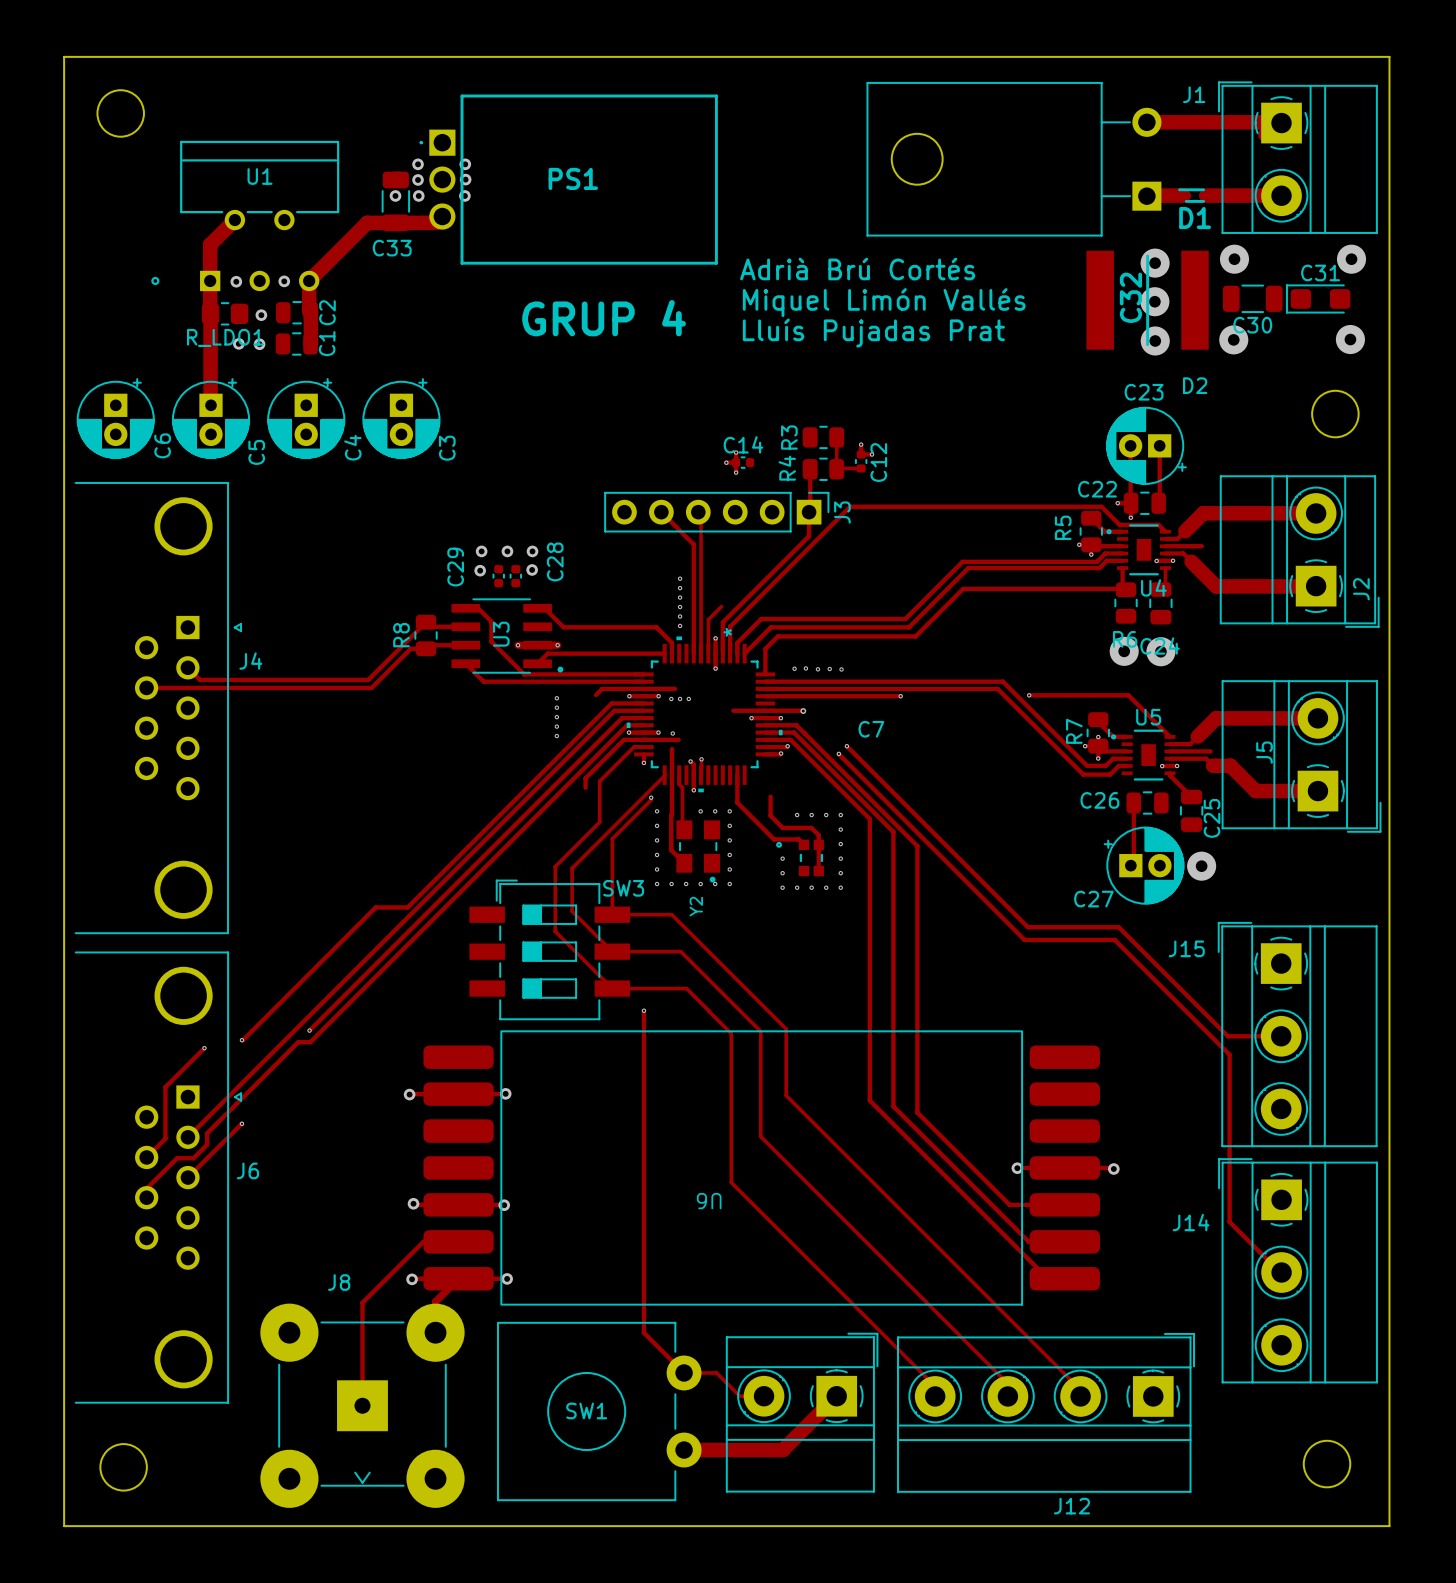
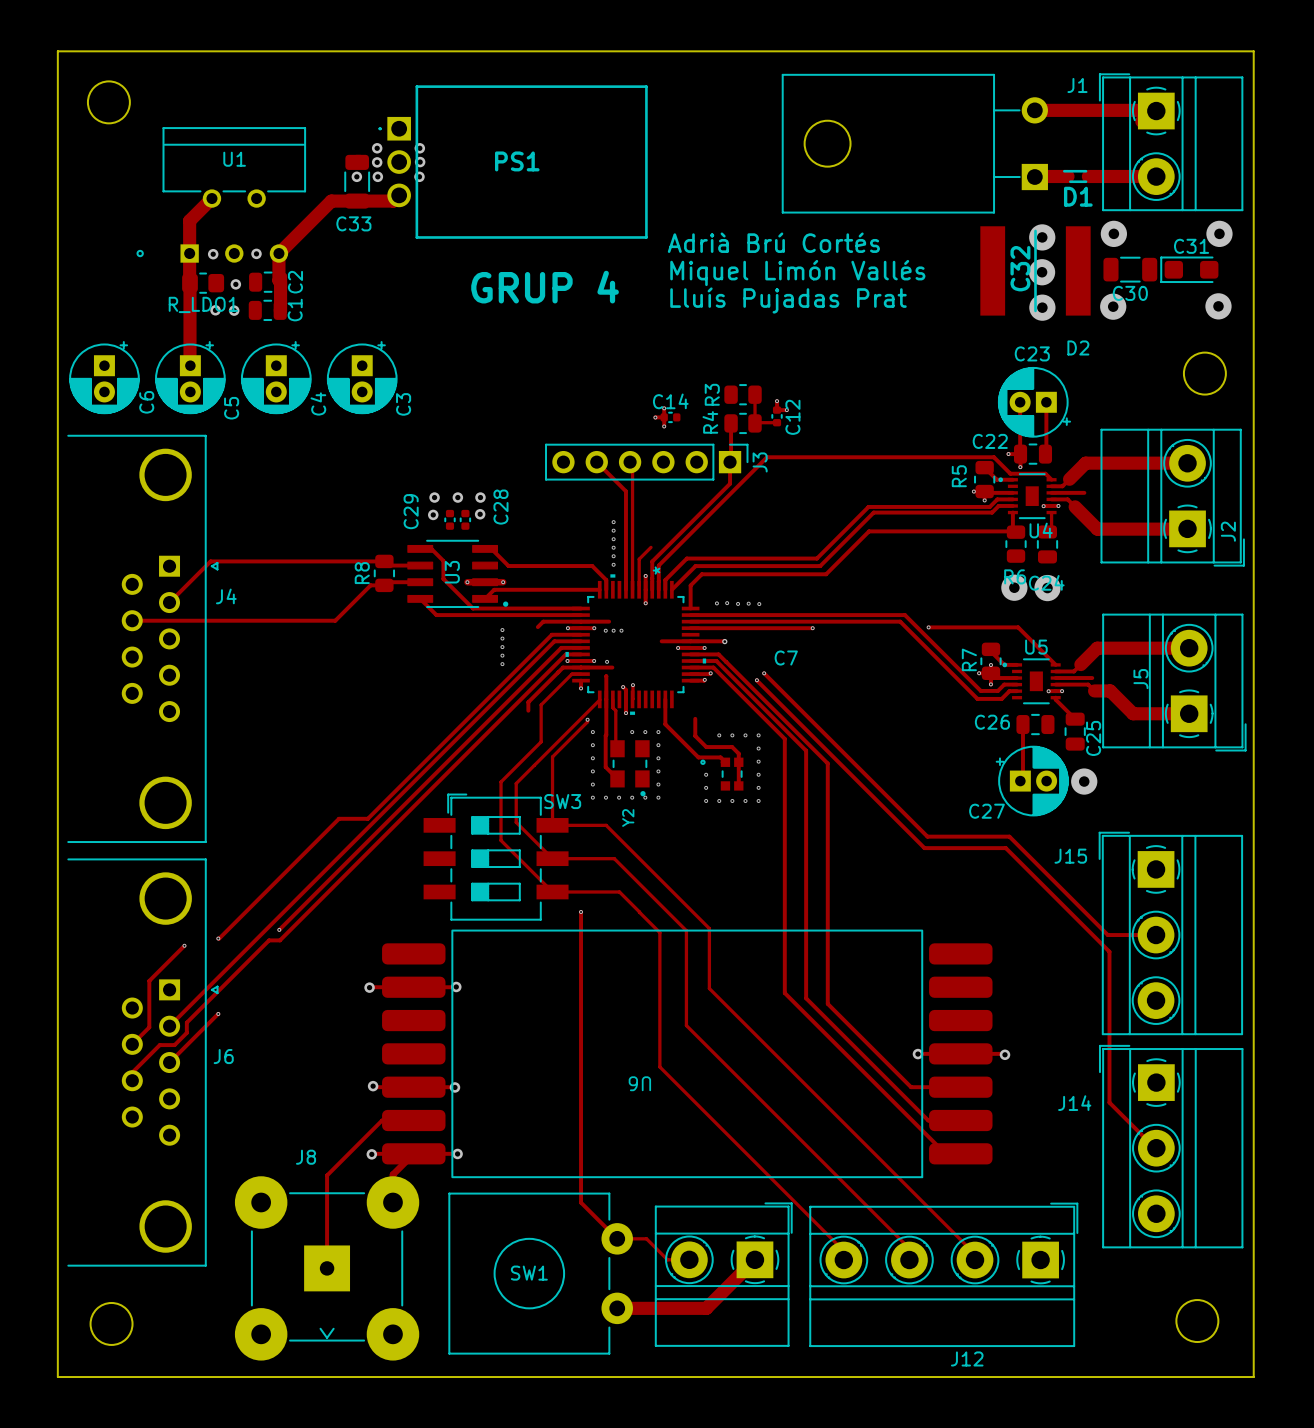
track: (426, 622) (368, 679) (200, 679) (187, 667) -> (384, 561) (210, 561) (169, 602)

